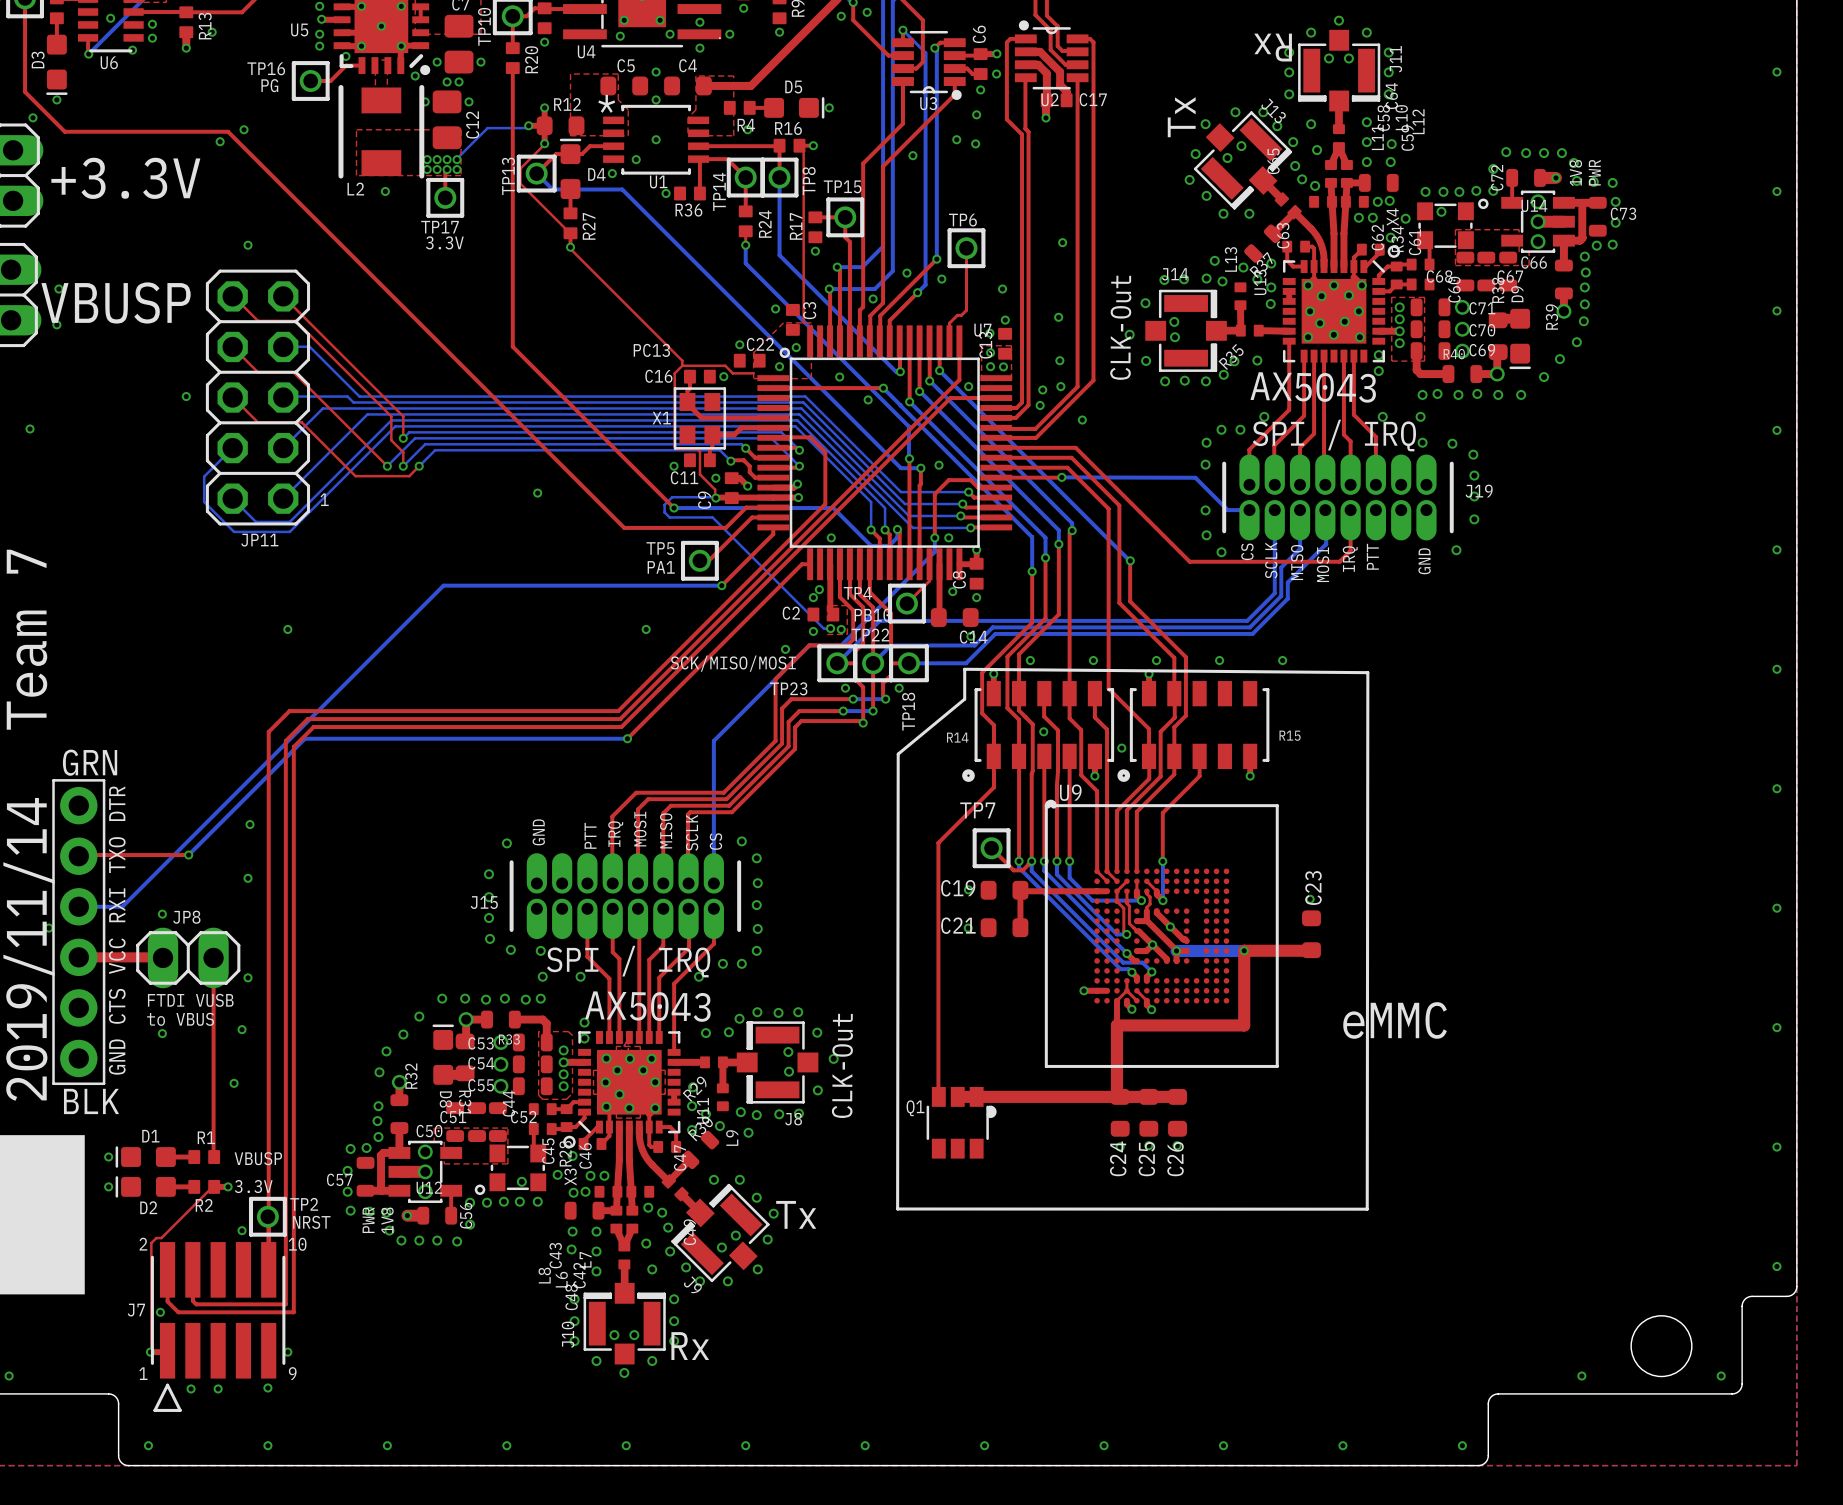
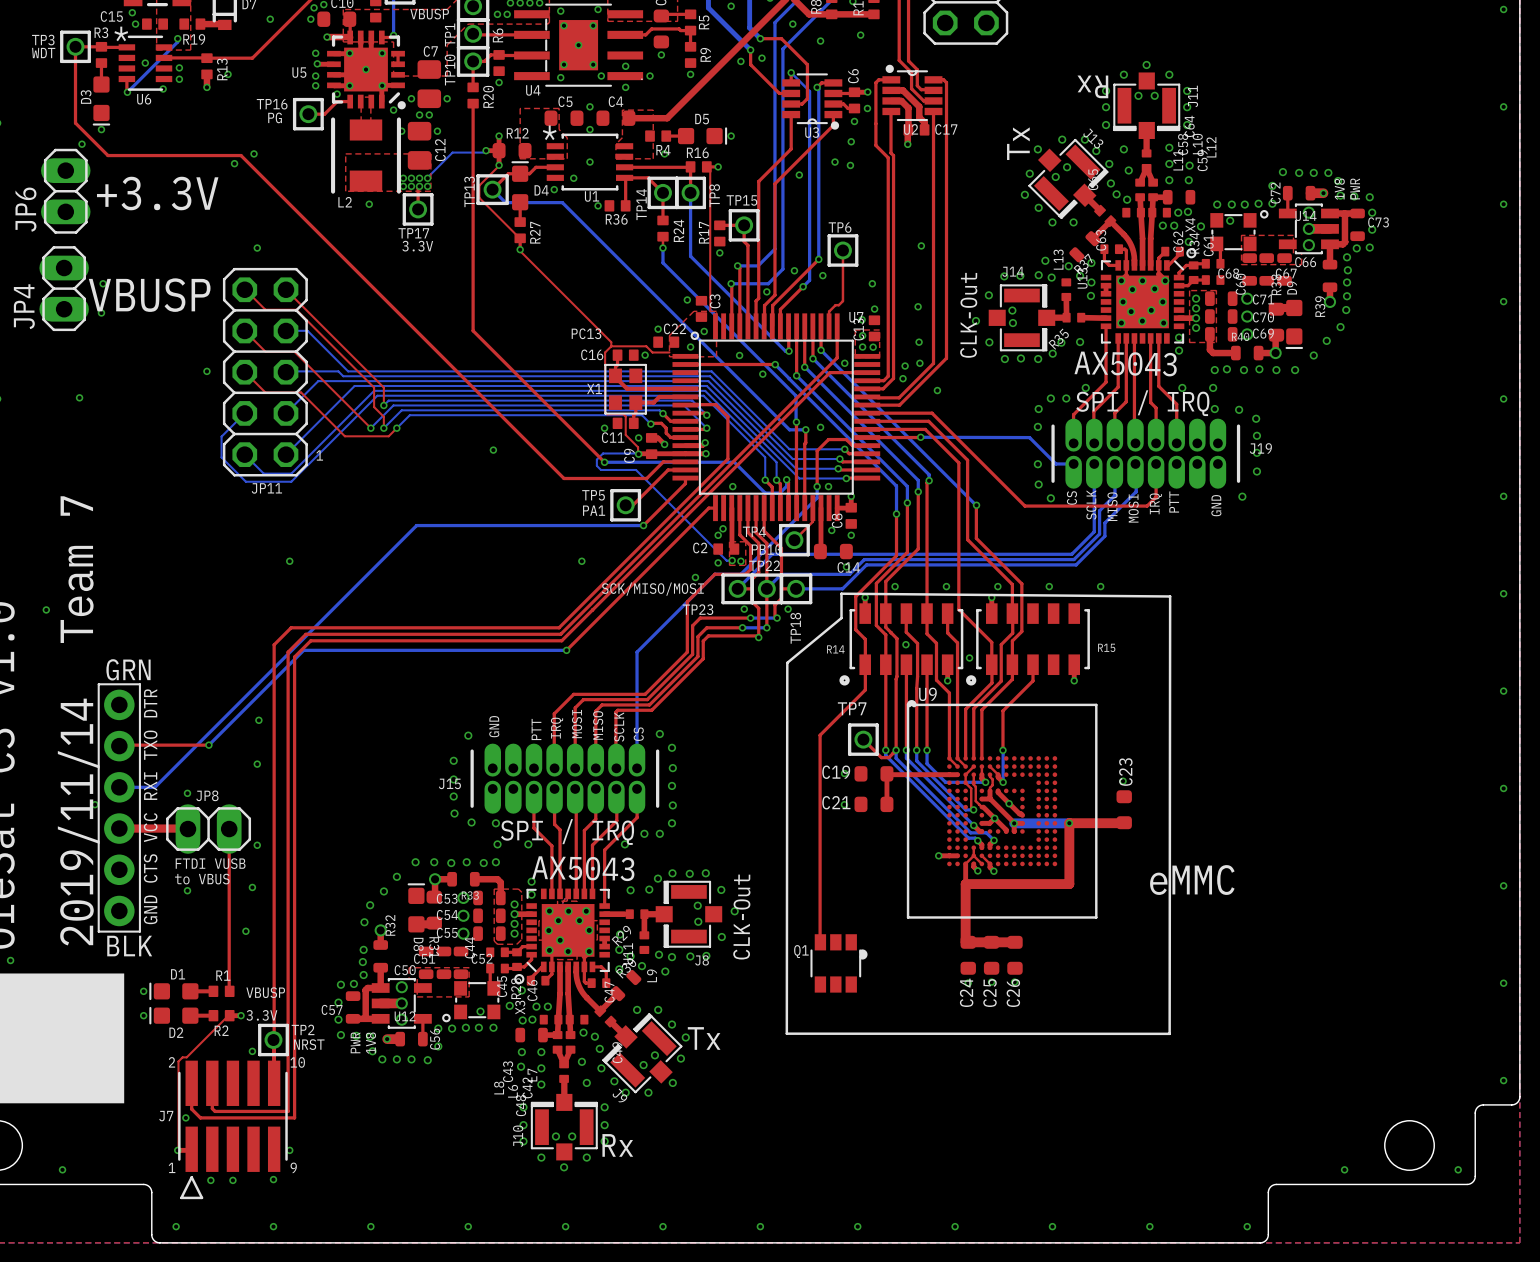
top track: (957, 1096) (1117, 1096) -> none

